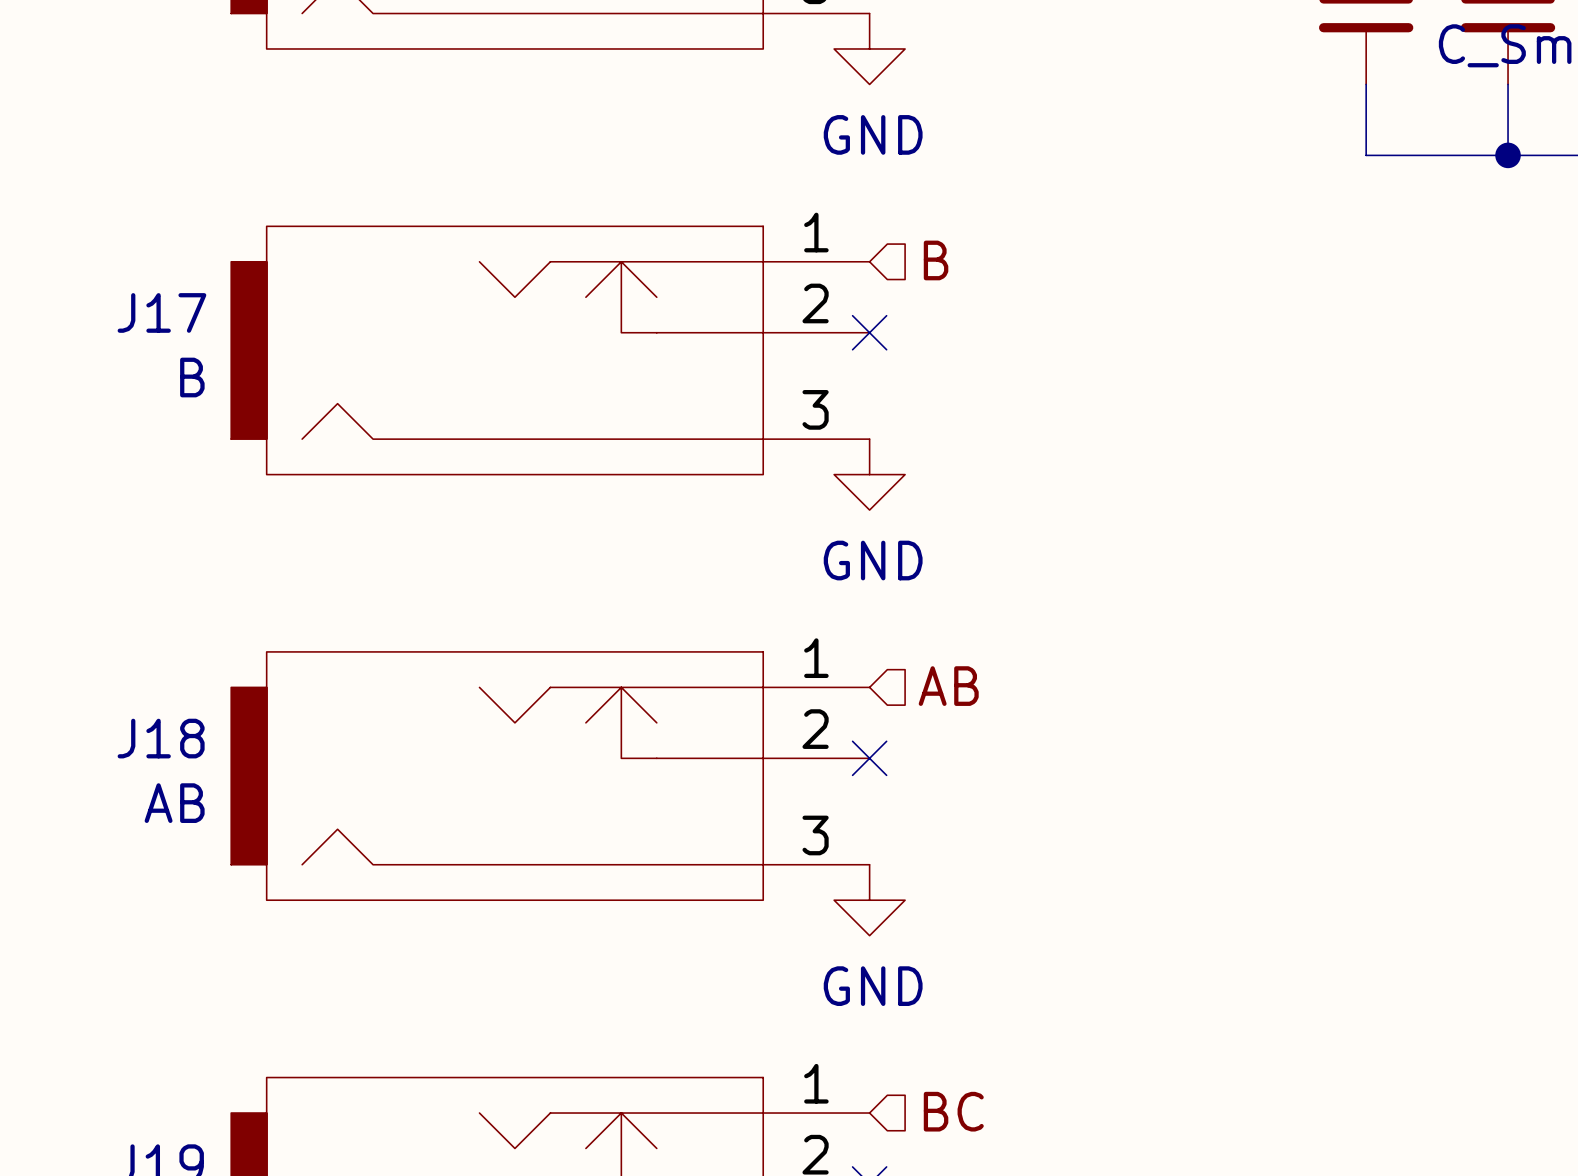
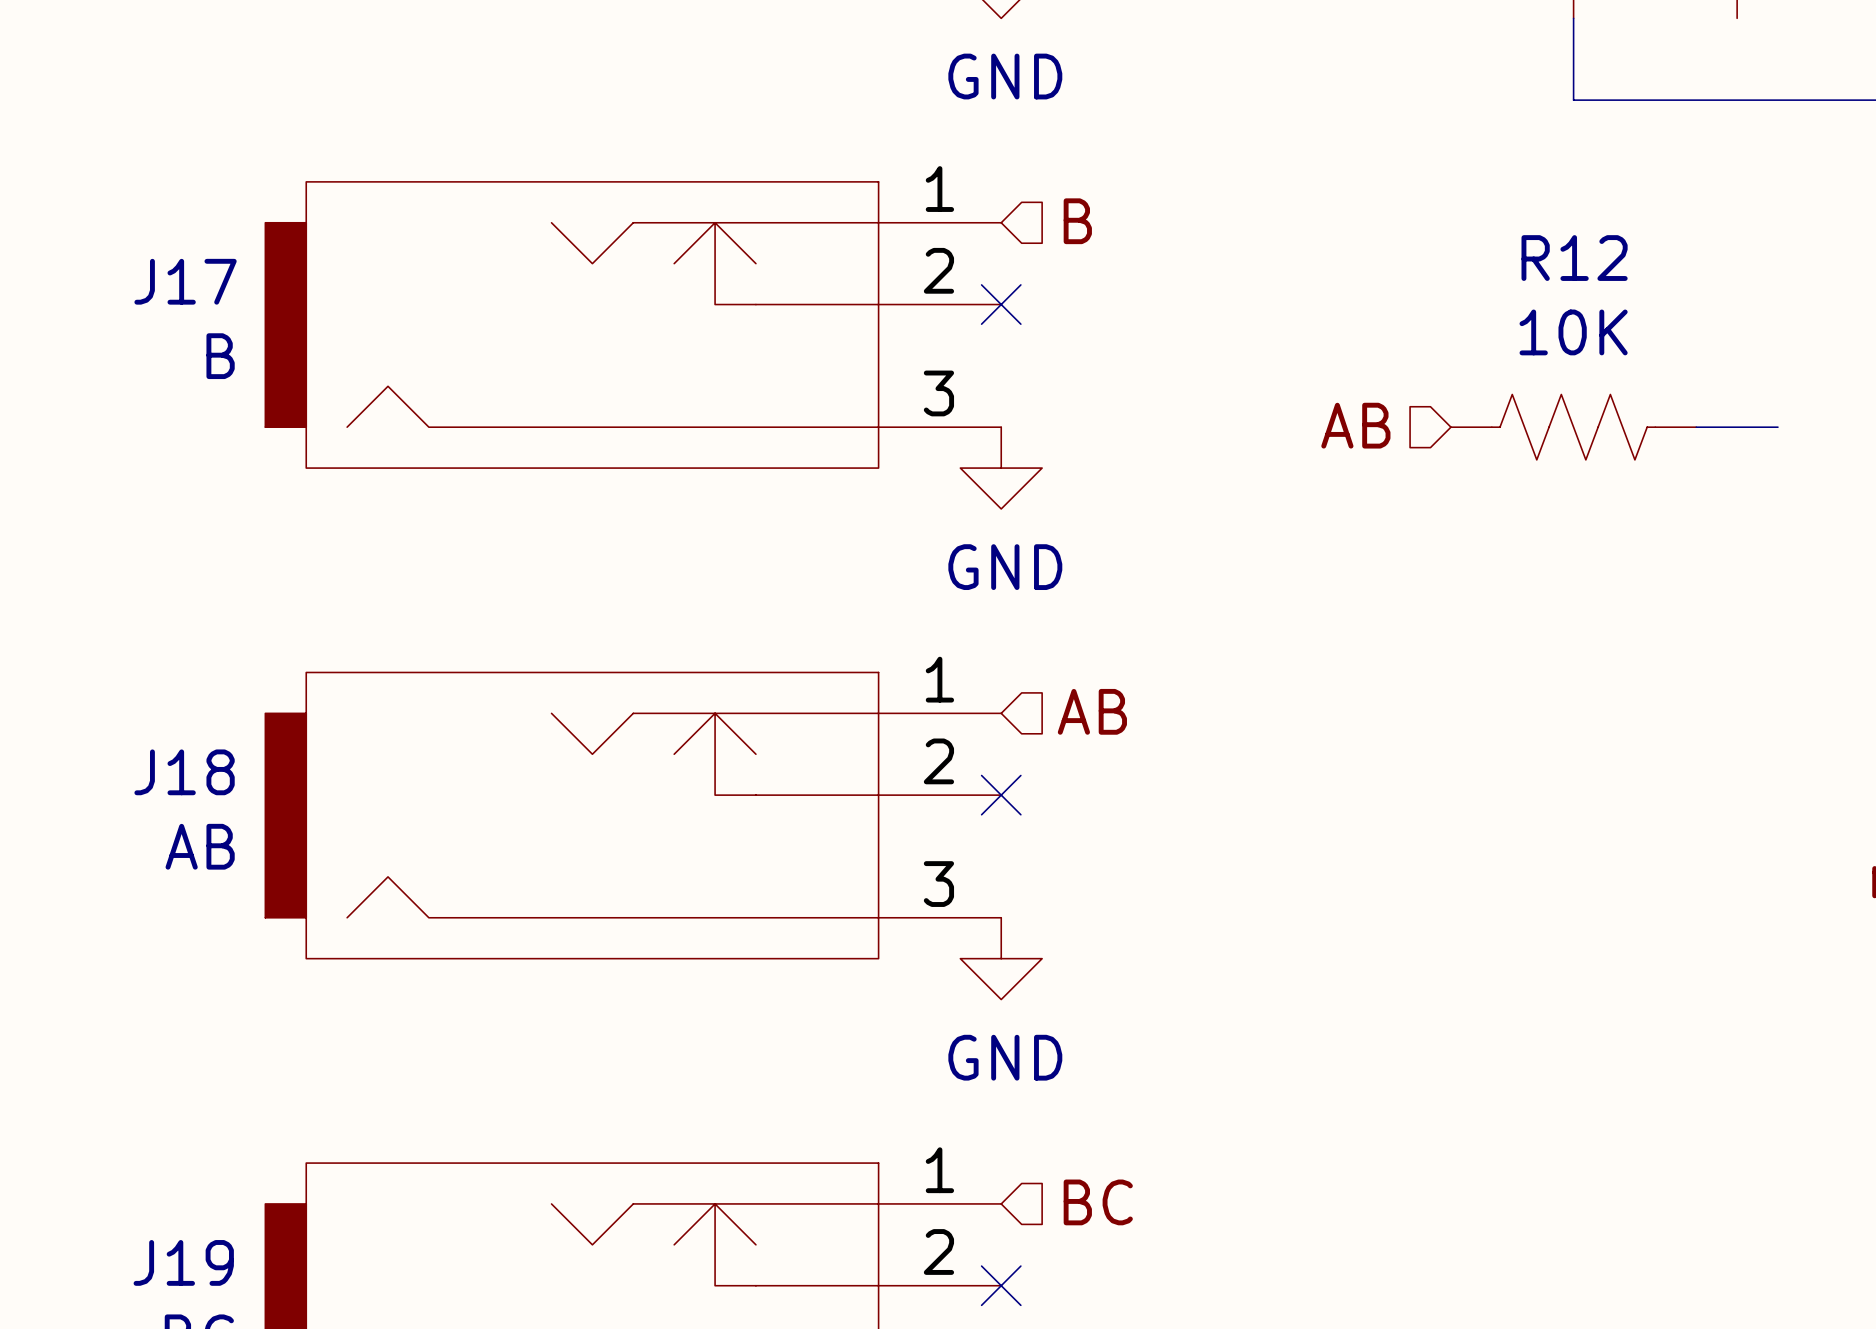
wire: (1508, 84) (1508, 155) -> none
junction: (1508, 155) -> none
hierarchical label: none -> AB (1355, 425)
R12: none -> 10K (1573, 427)
wire: none -> (1696, 427) (1778, 427)

